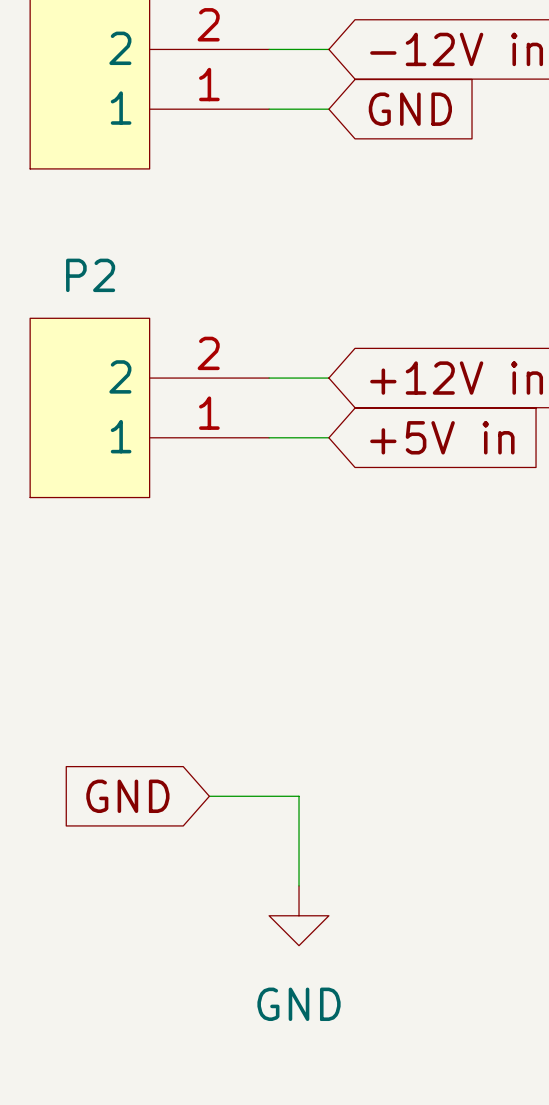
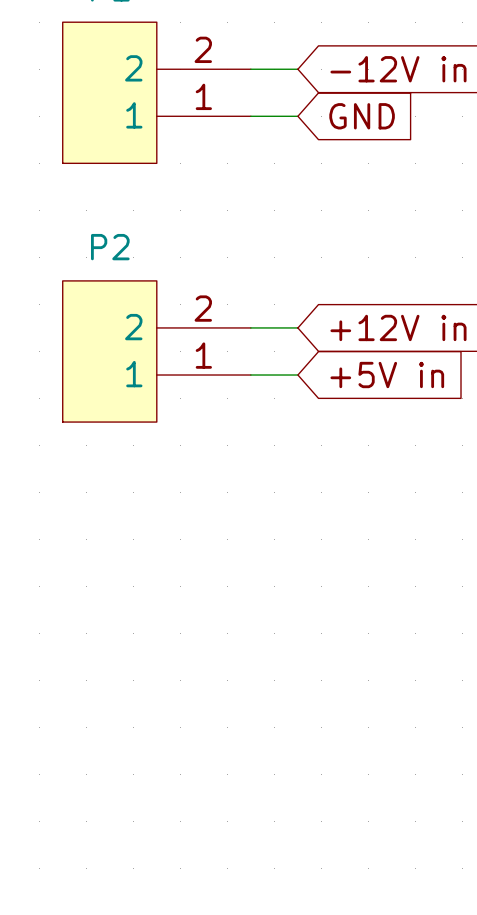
global label: GND (127, 796) -> none
wire: (209, 796) (299, 796) (299, 885) -> none
power symbol: GND (299, 915) -> none

